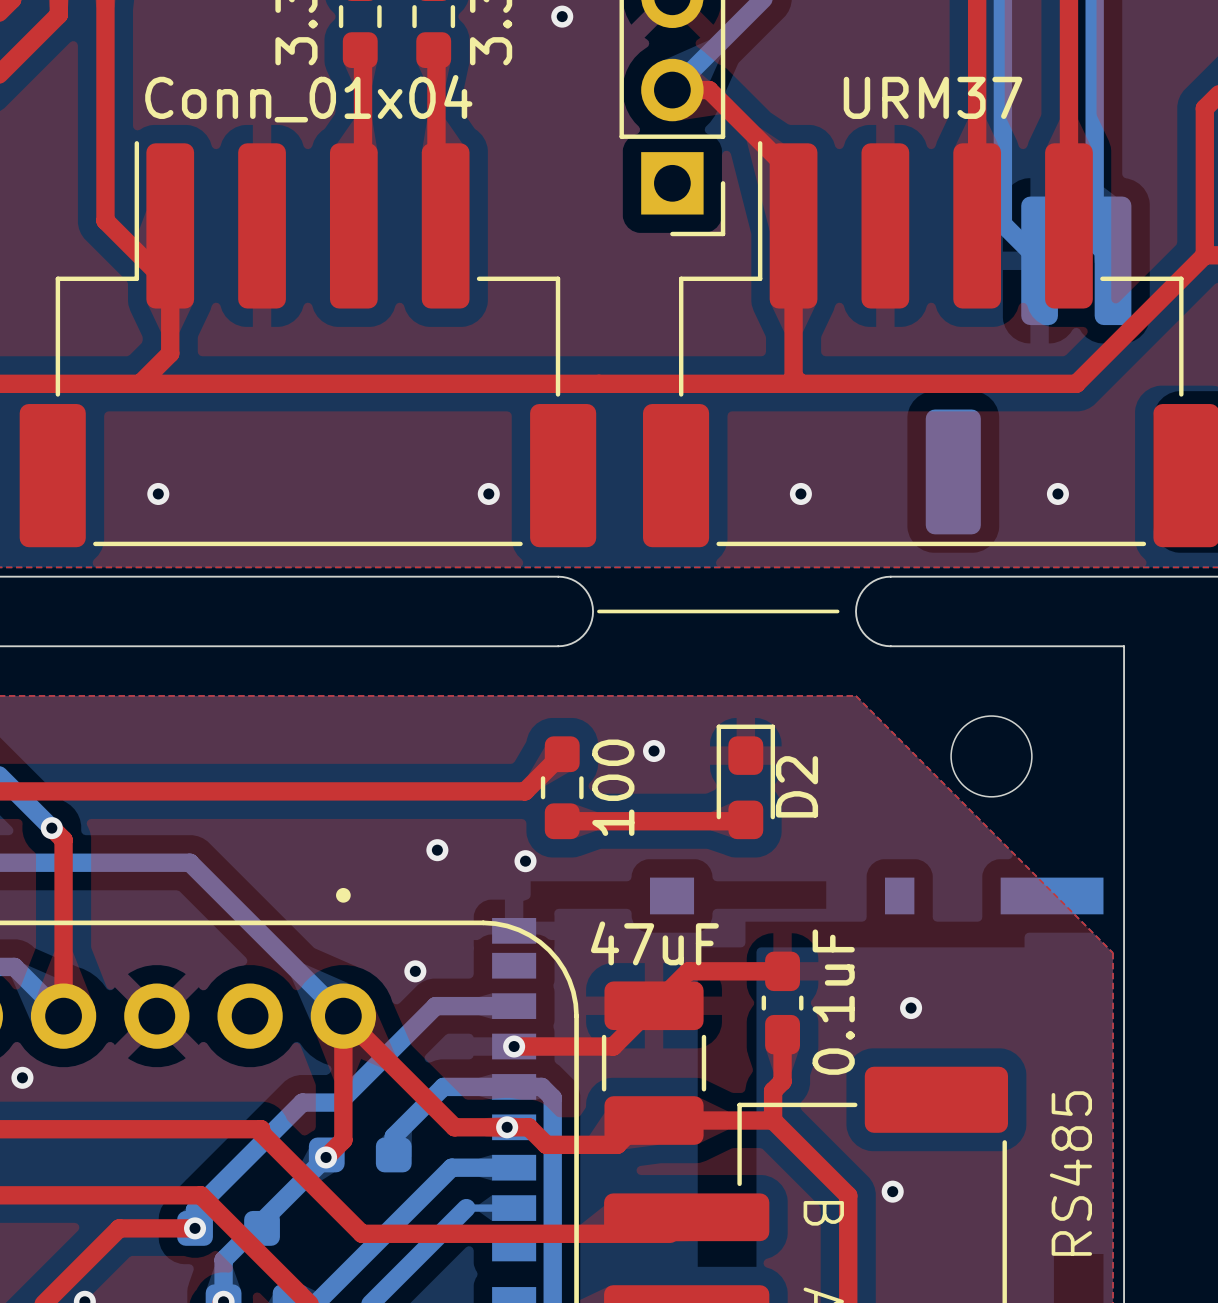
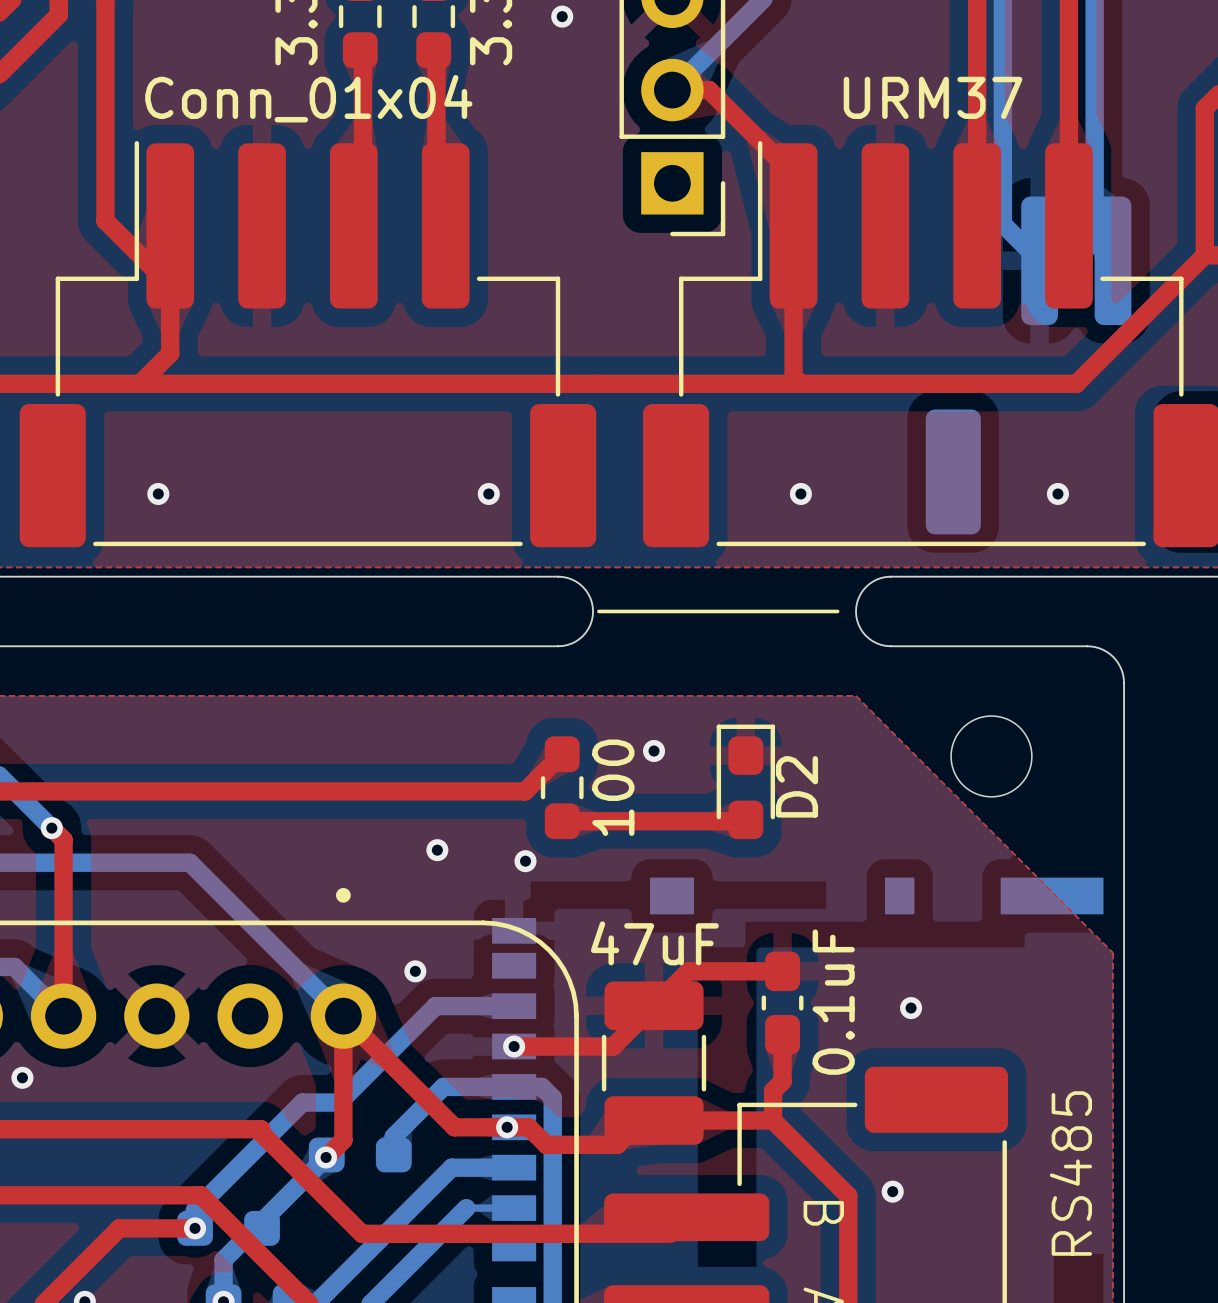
board edge: (1087, 646) (1124, 646) (1124, 682) -> (1087, 646) (1103, 649) (1113, 657) (1121, 670) (1124, 682)

